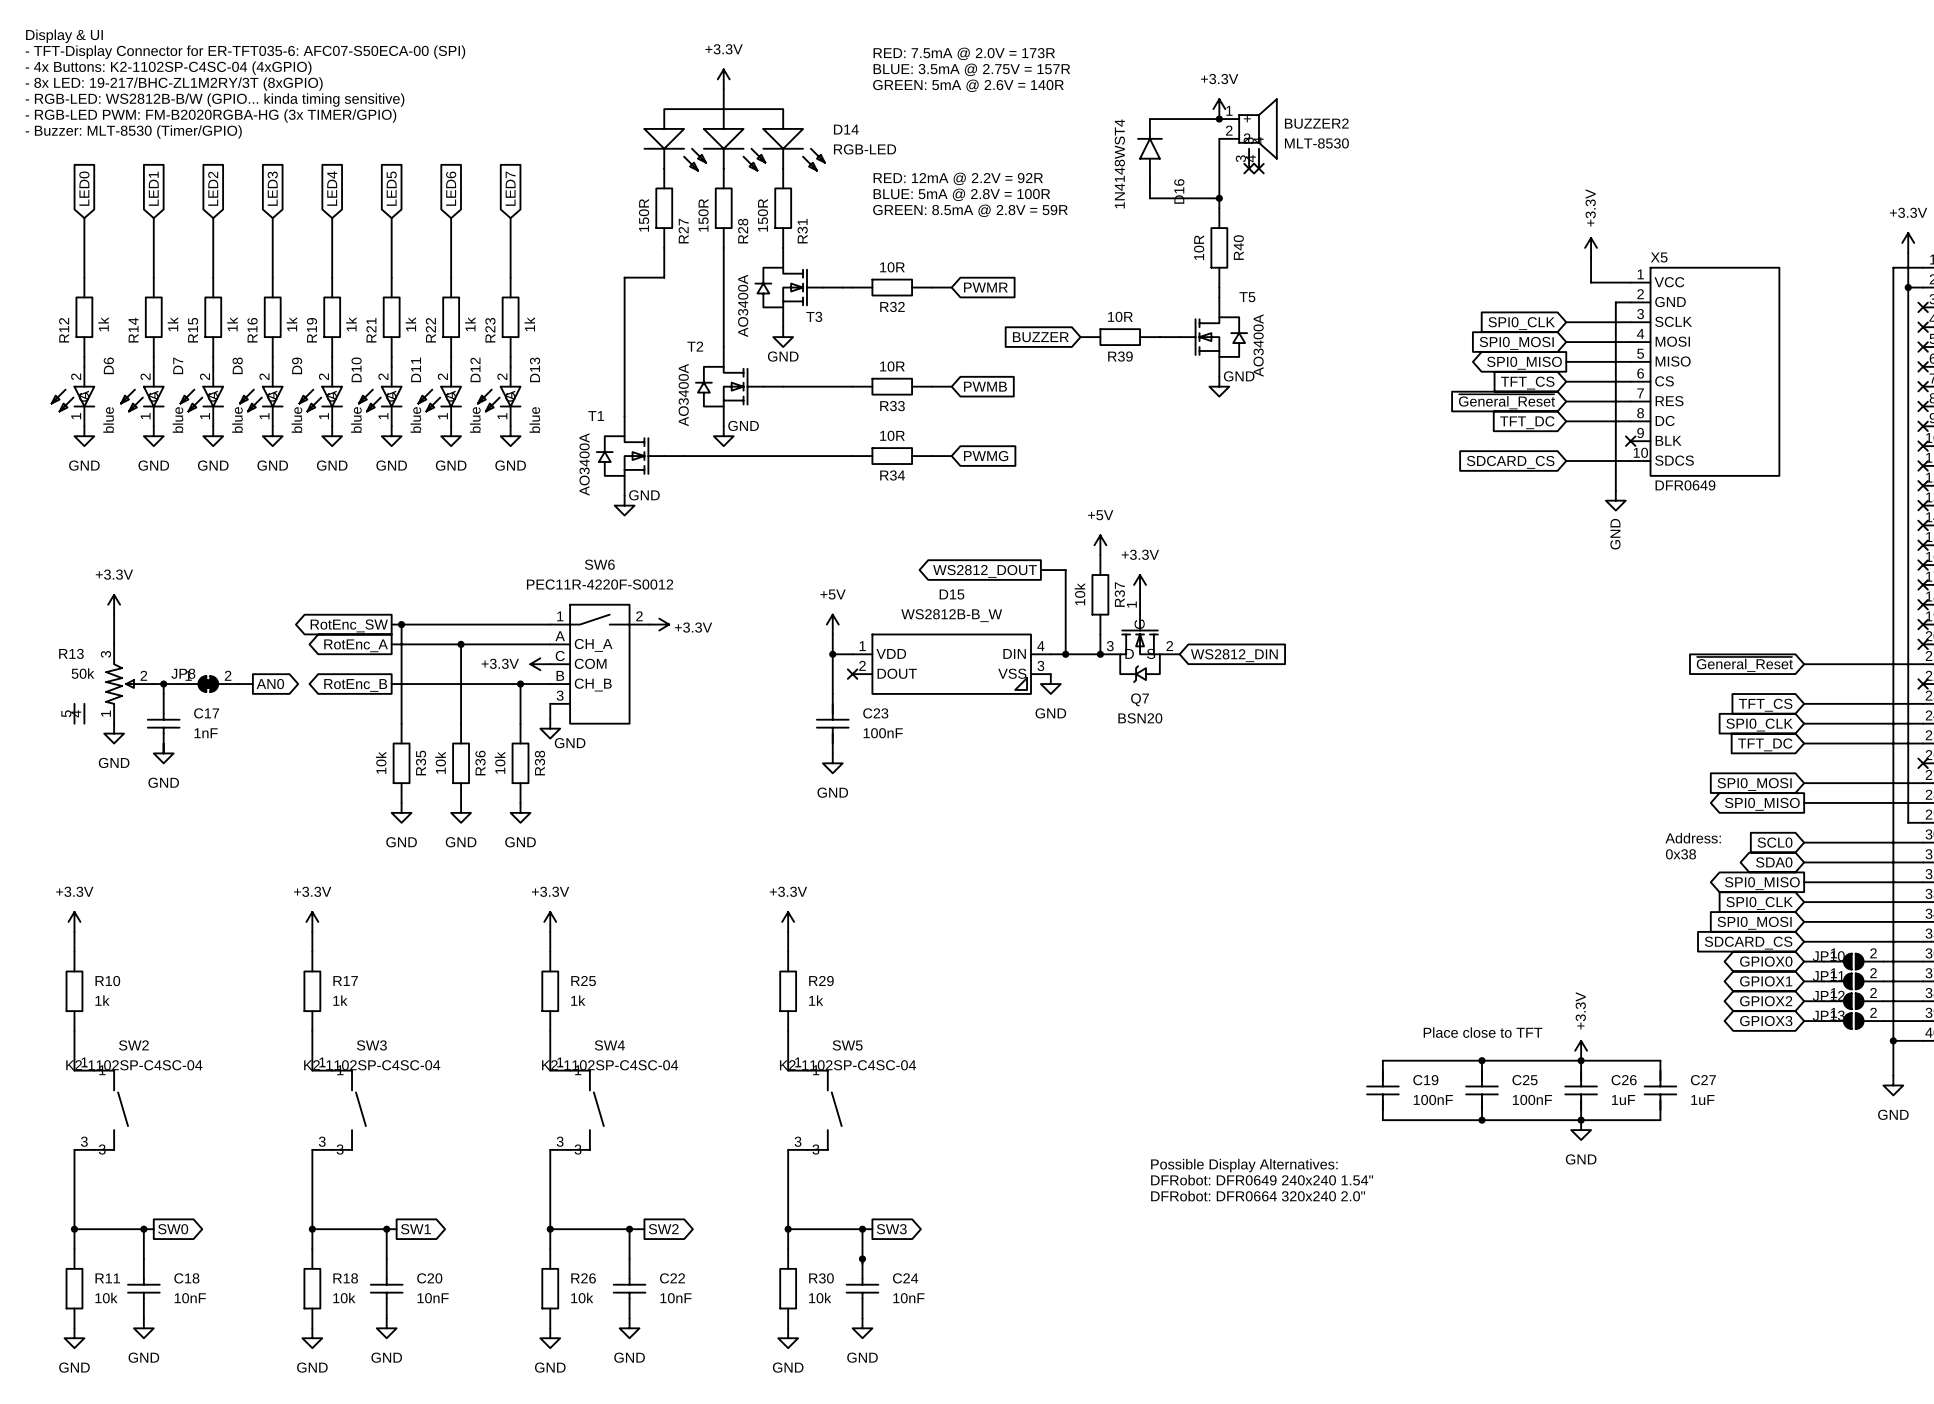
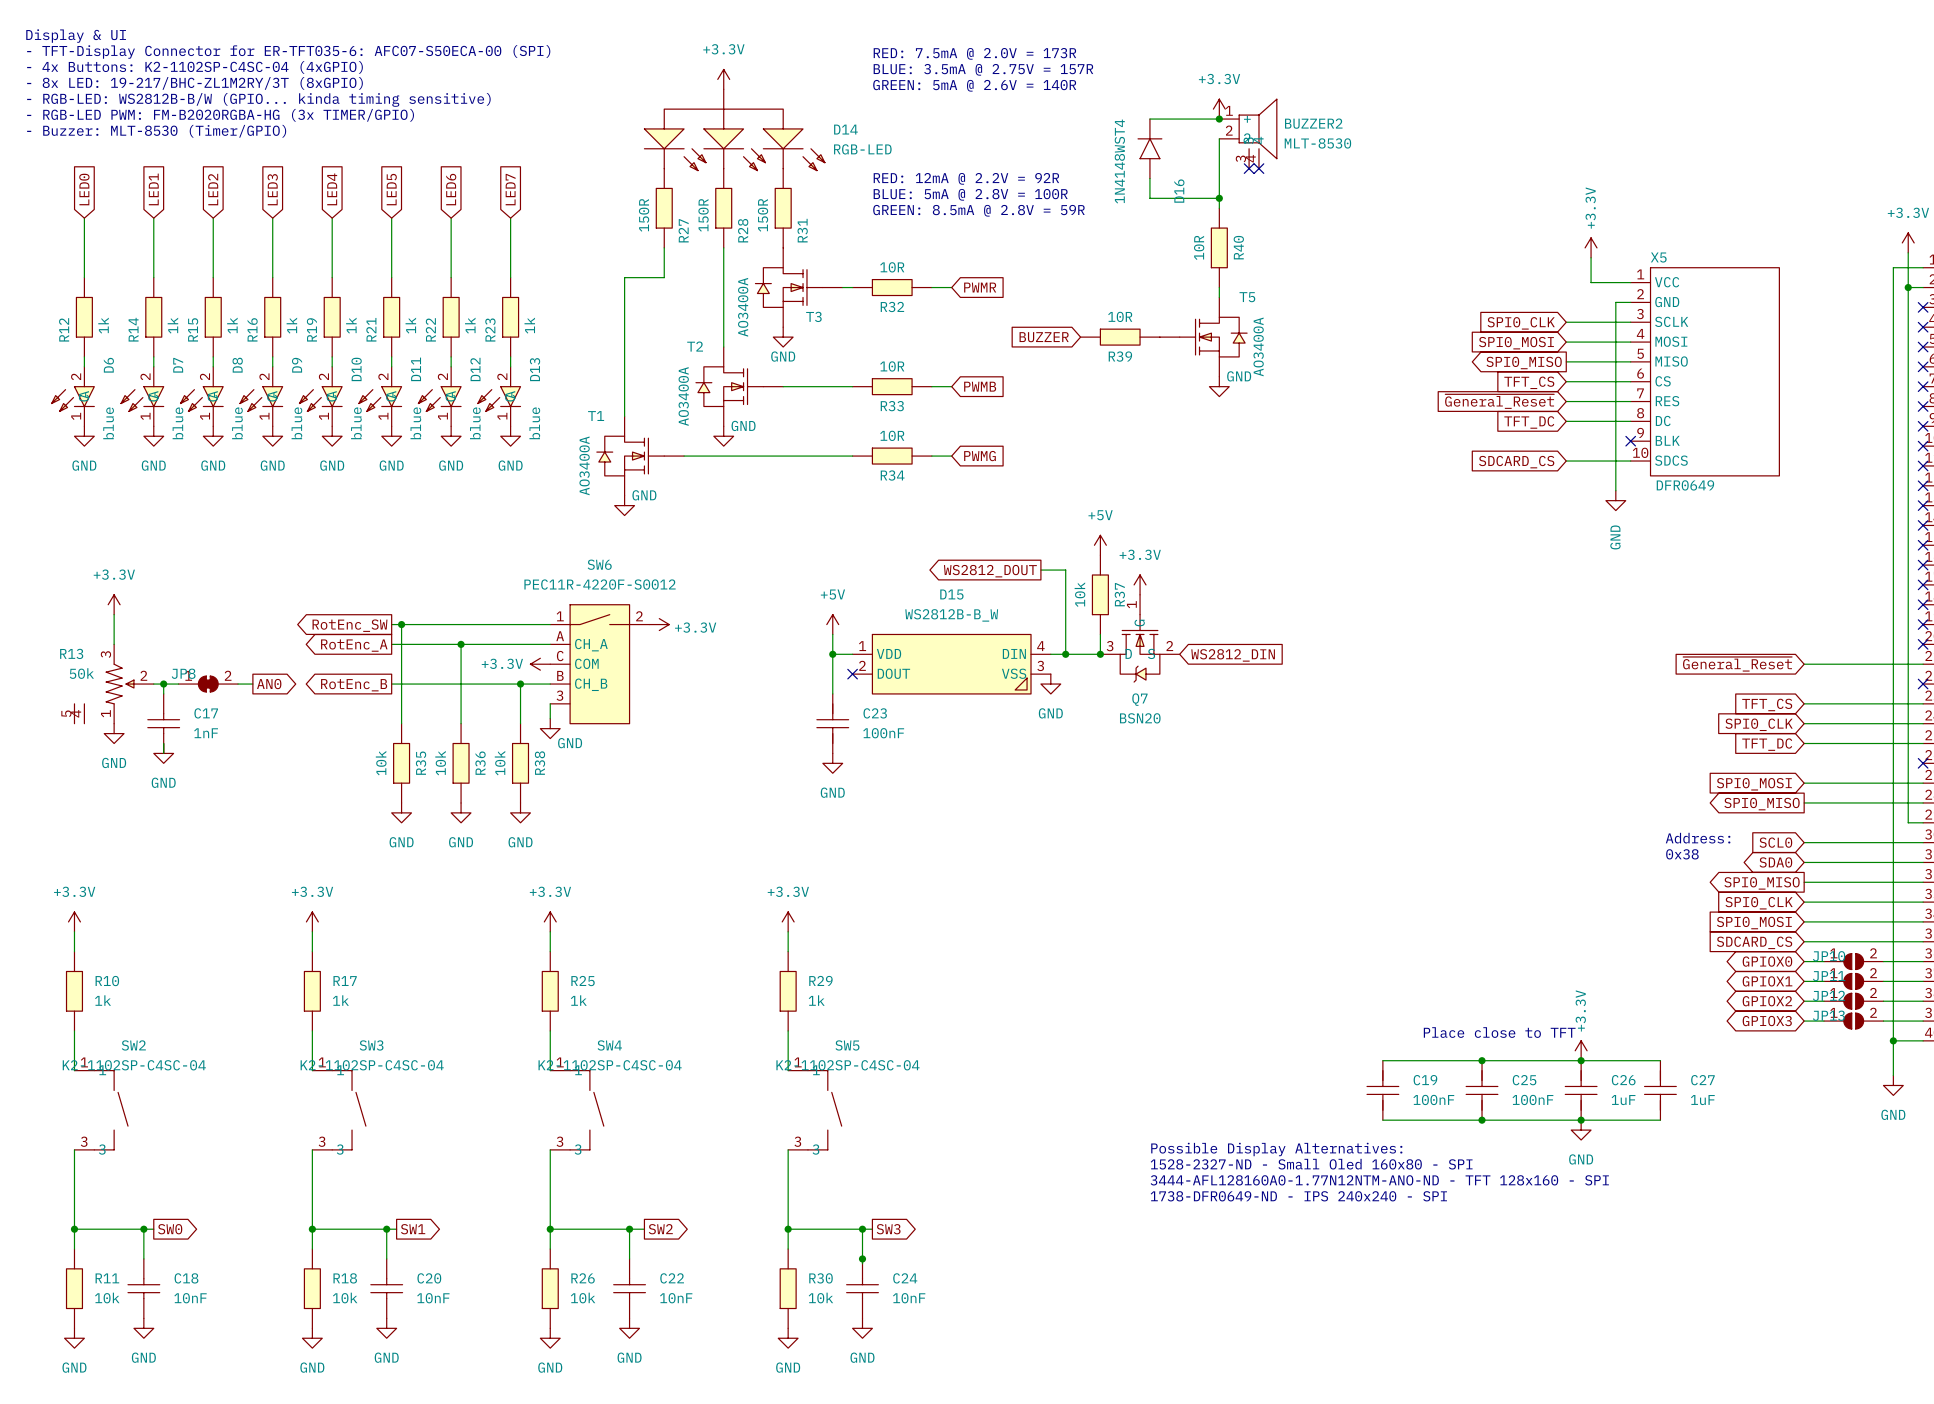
text: none -> Possible Display Alternatives: (1276, 1149)
text: Possible Display Alternatives: (1244, 1165) -> 1528-2327-ND - Small Oled 160x80 - SPI (1311, 1164)
text: DFRobot: DFR0649 240x240 1.54" (1262, 1180) -> 3444-AFL128160A0-1.77N12NTM-ANO-ND - TFT 128x160 - SPI (1379, 1180)
text: DFRobot: DFR0664 320x240 2.0" (1258, 1196) -> 1738-DFR0649-ND - IPS 240x240 - SPI (1298, 1196)

